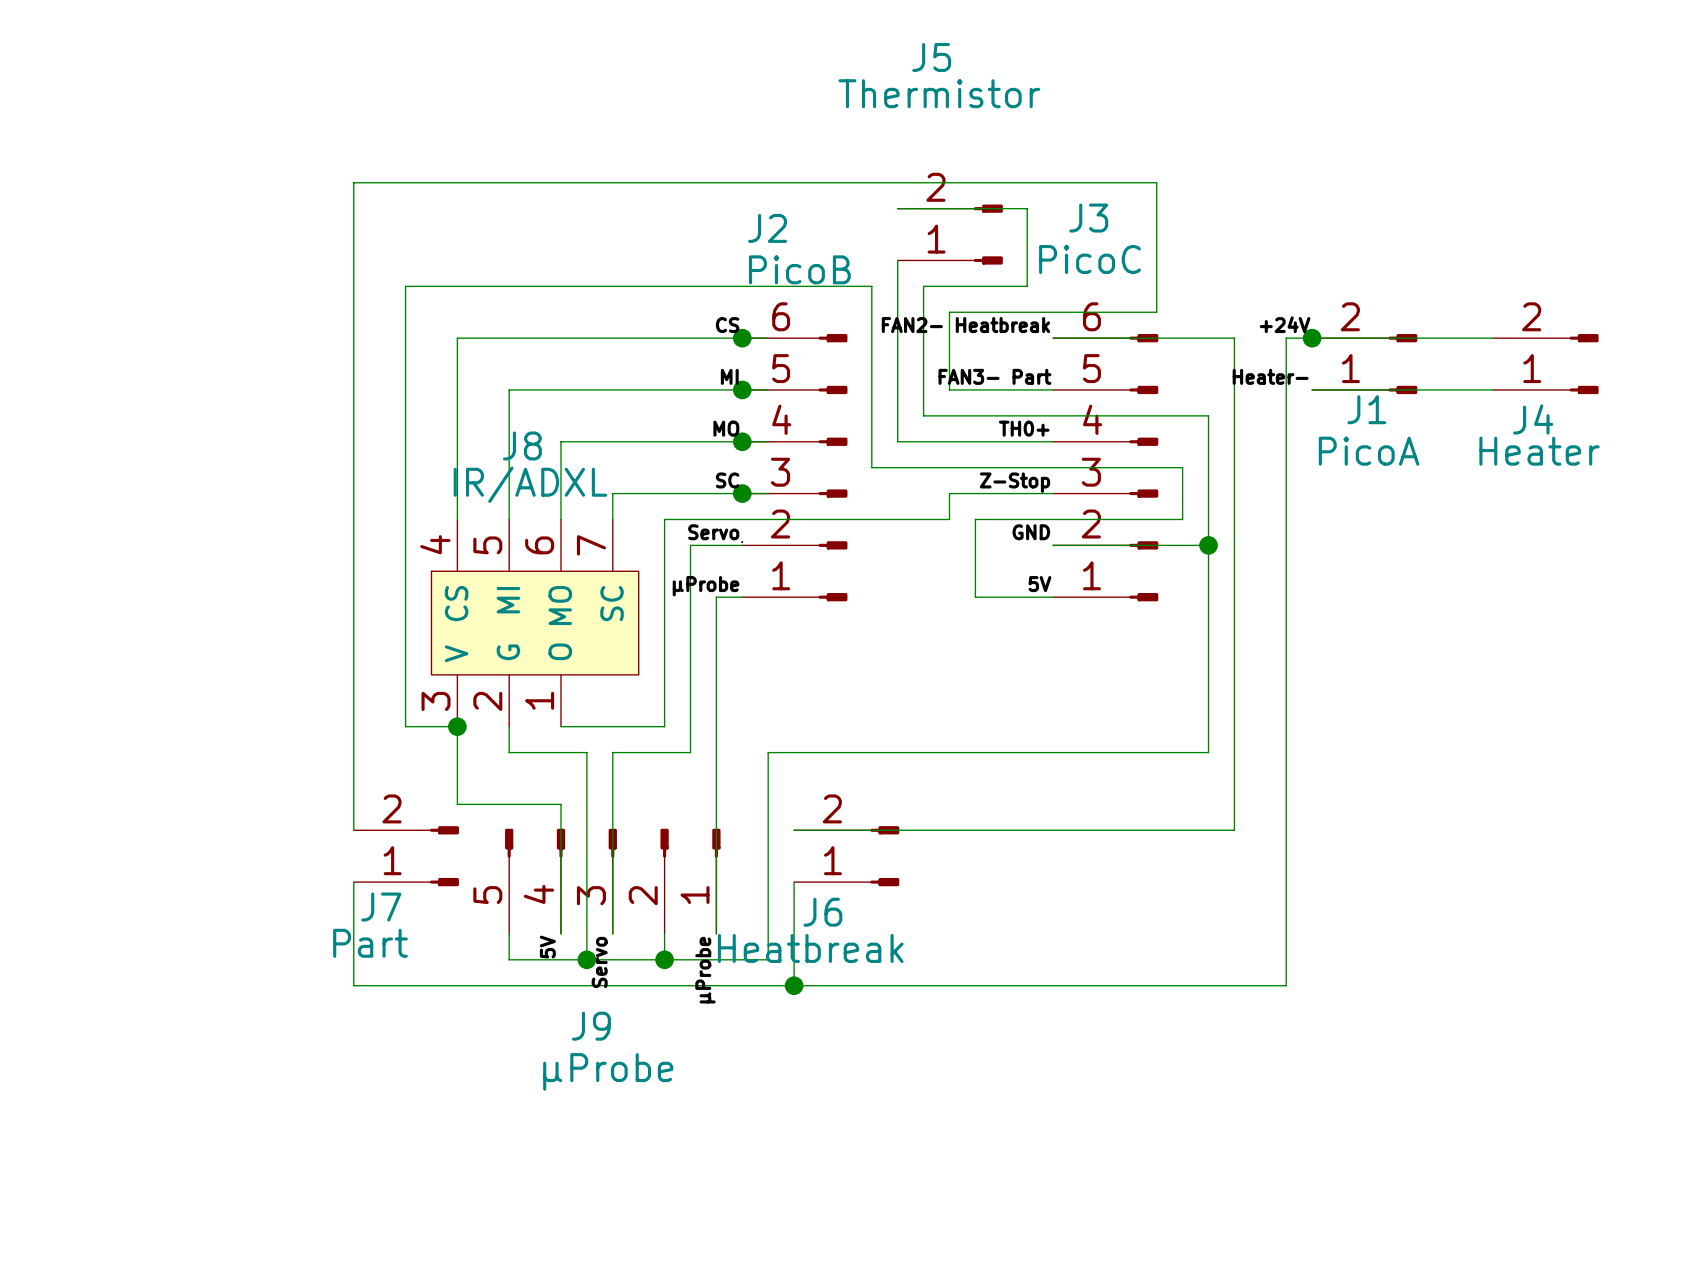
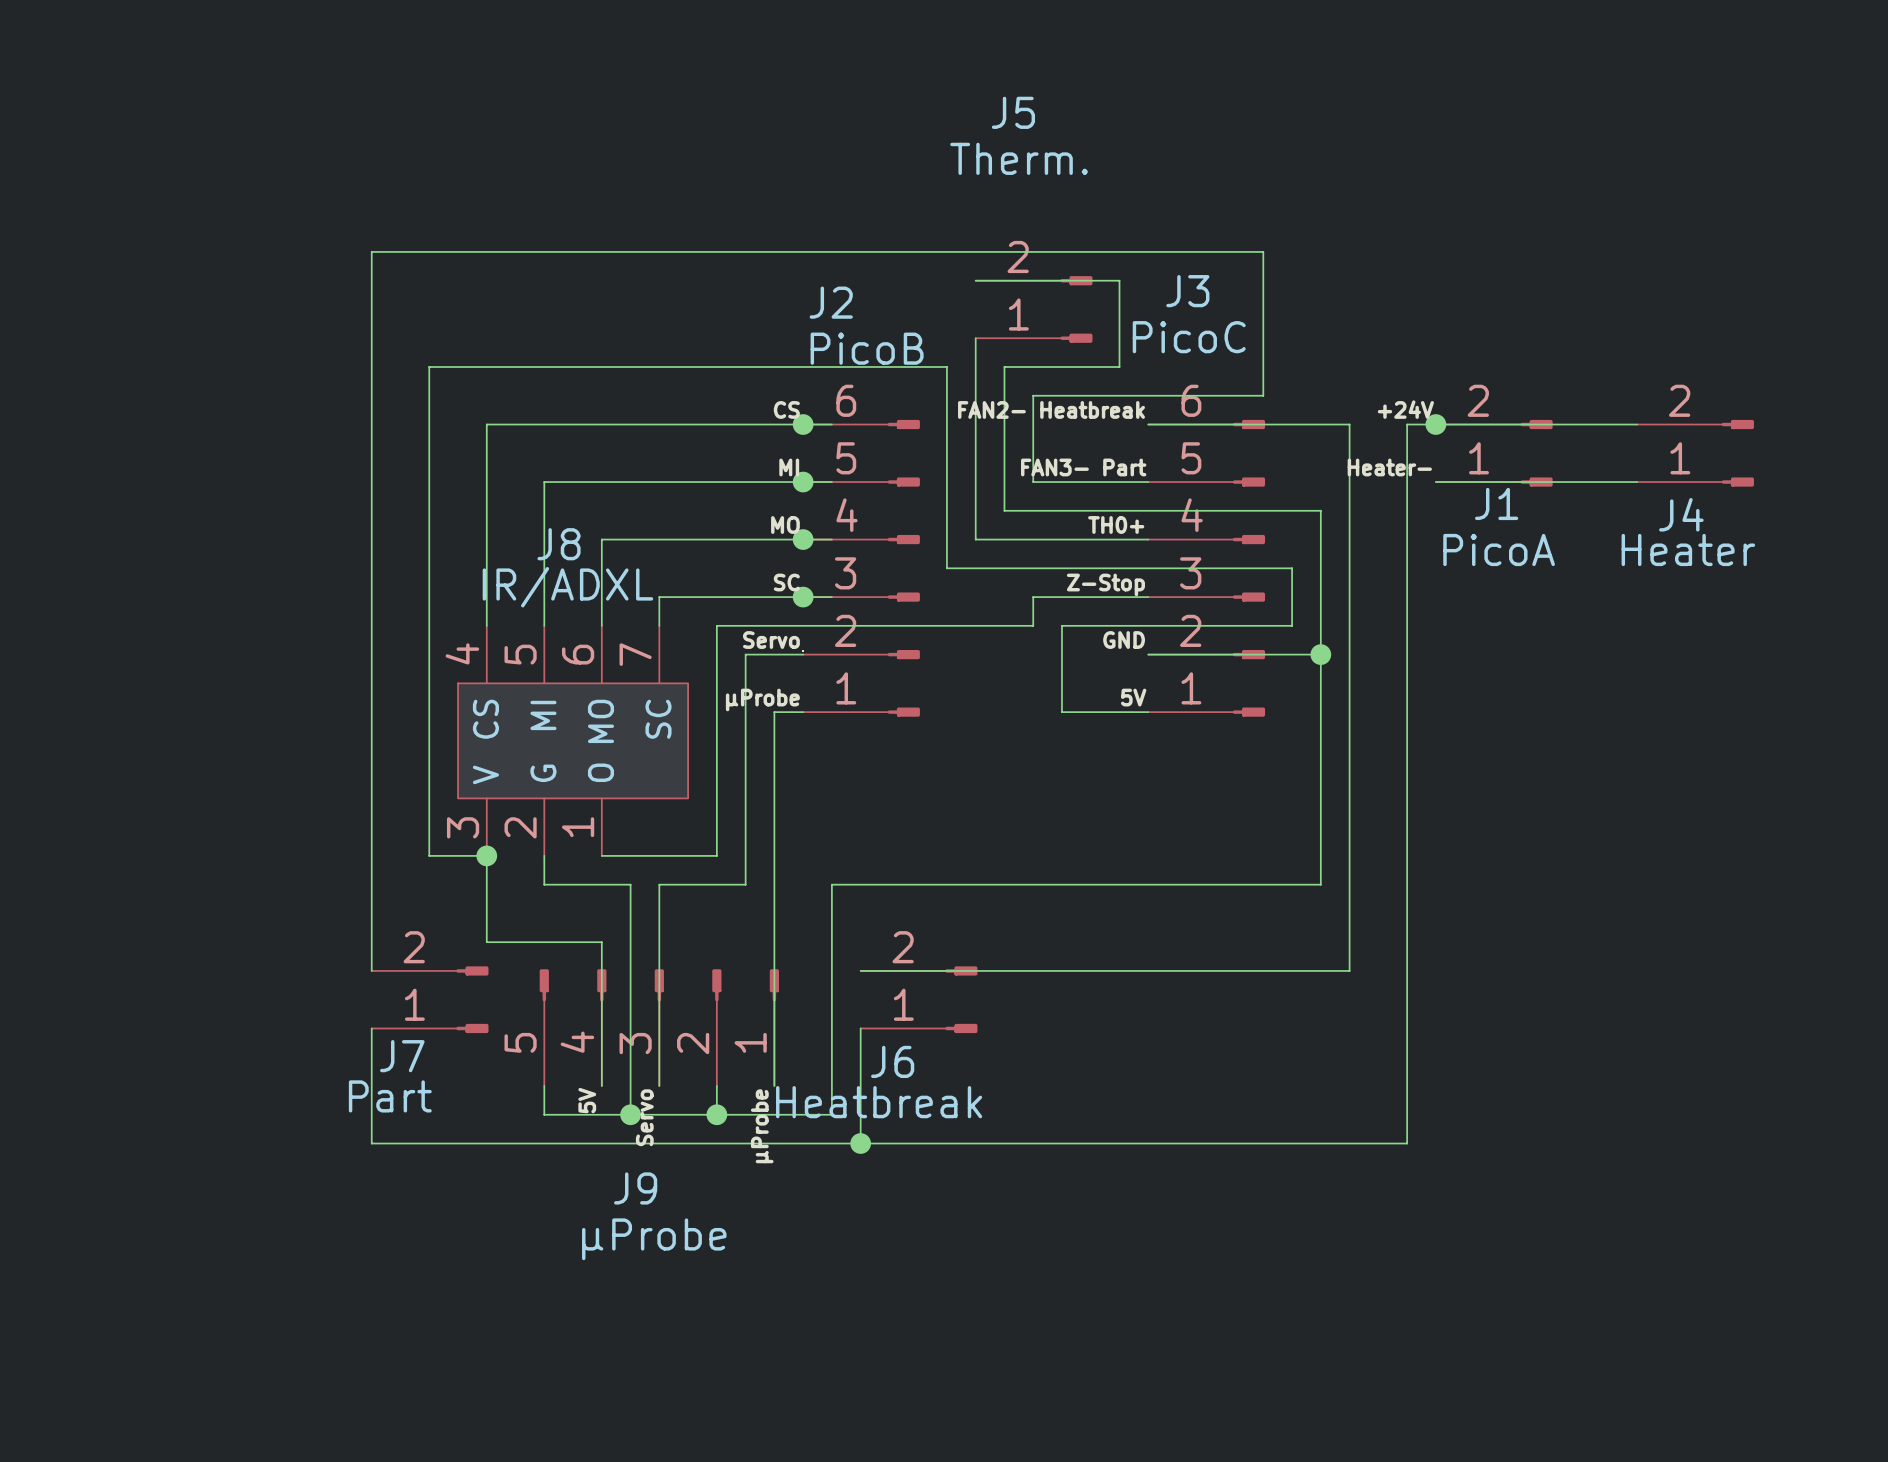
J5 value: Thermistor (939, 93) -> Therm. (1019, 158)

